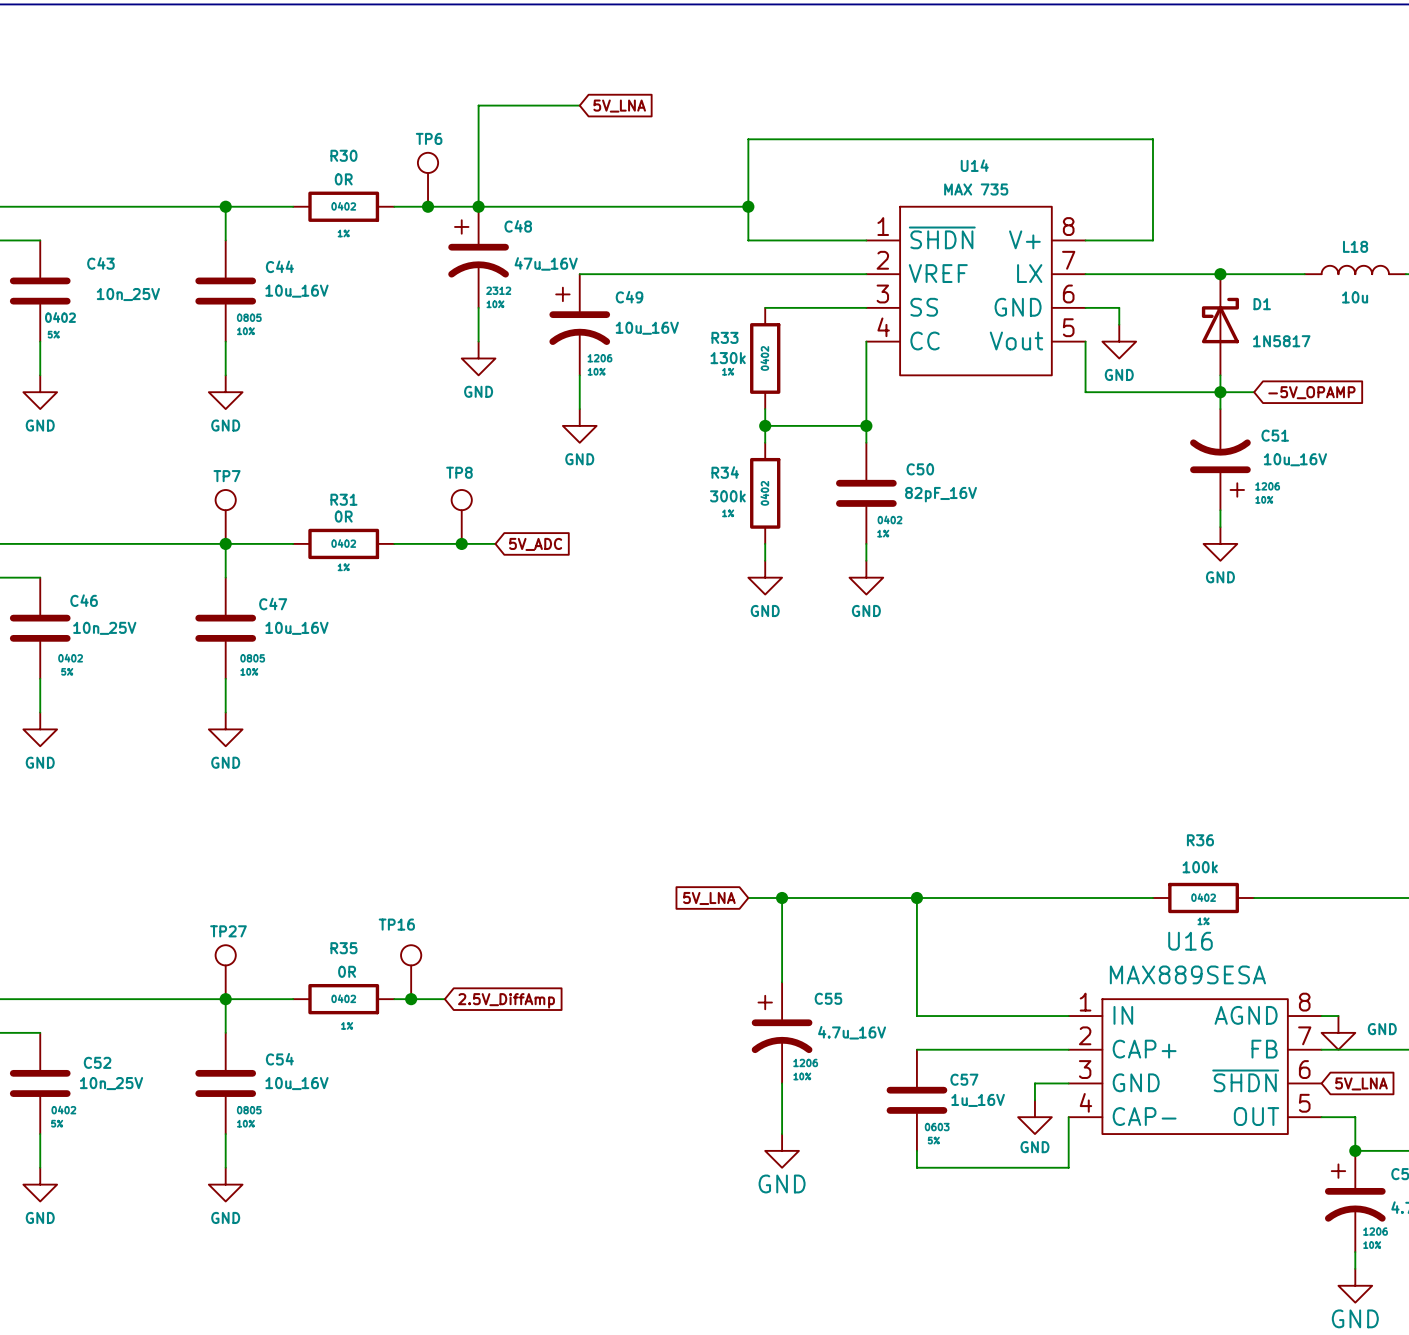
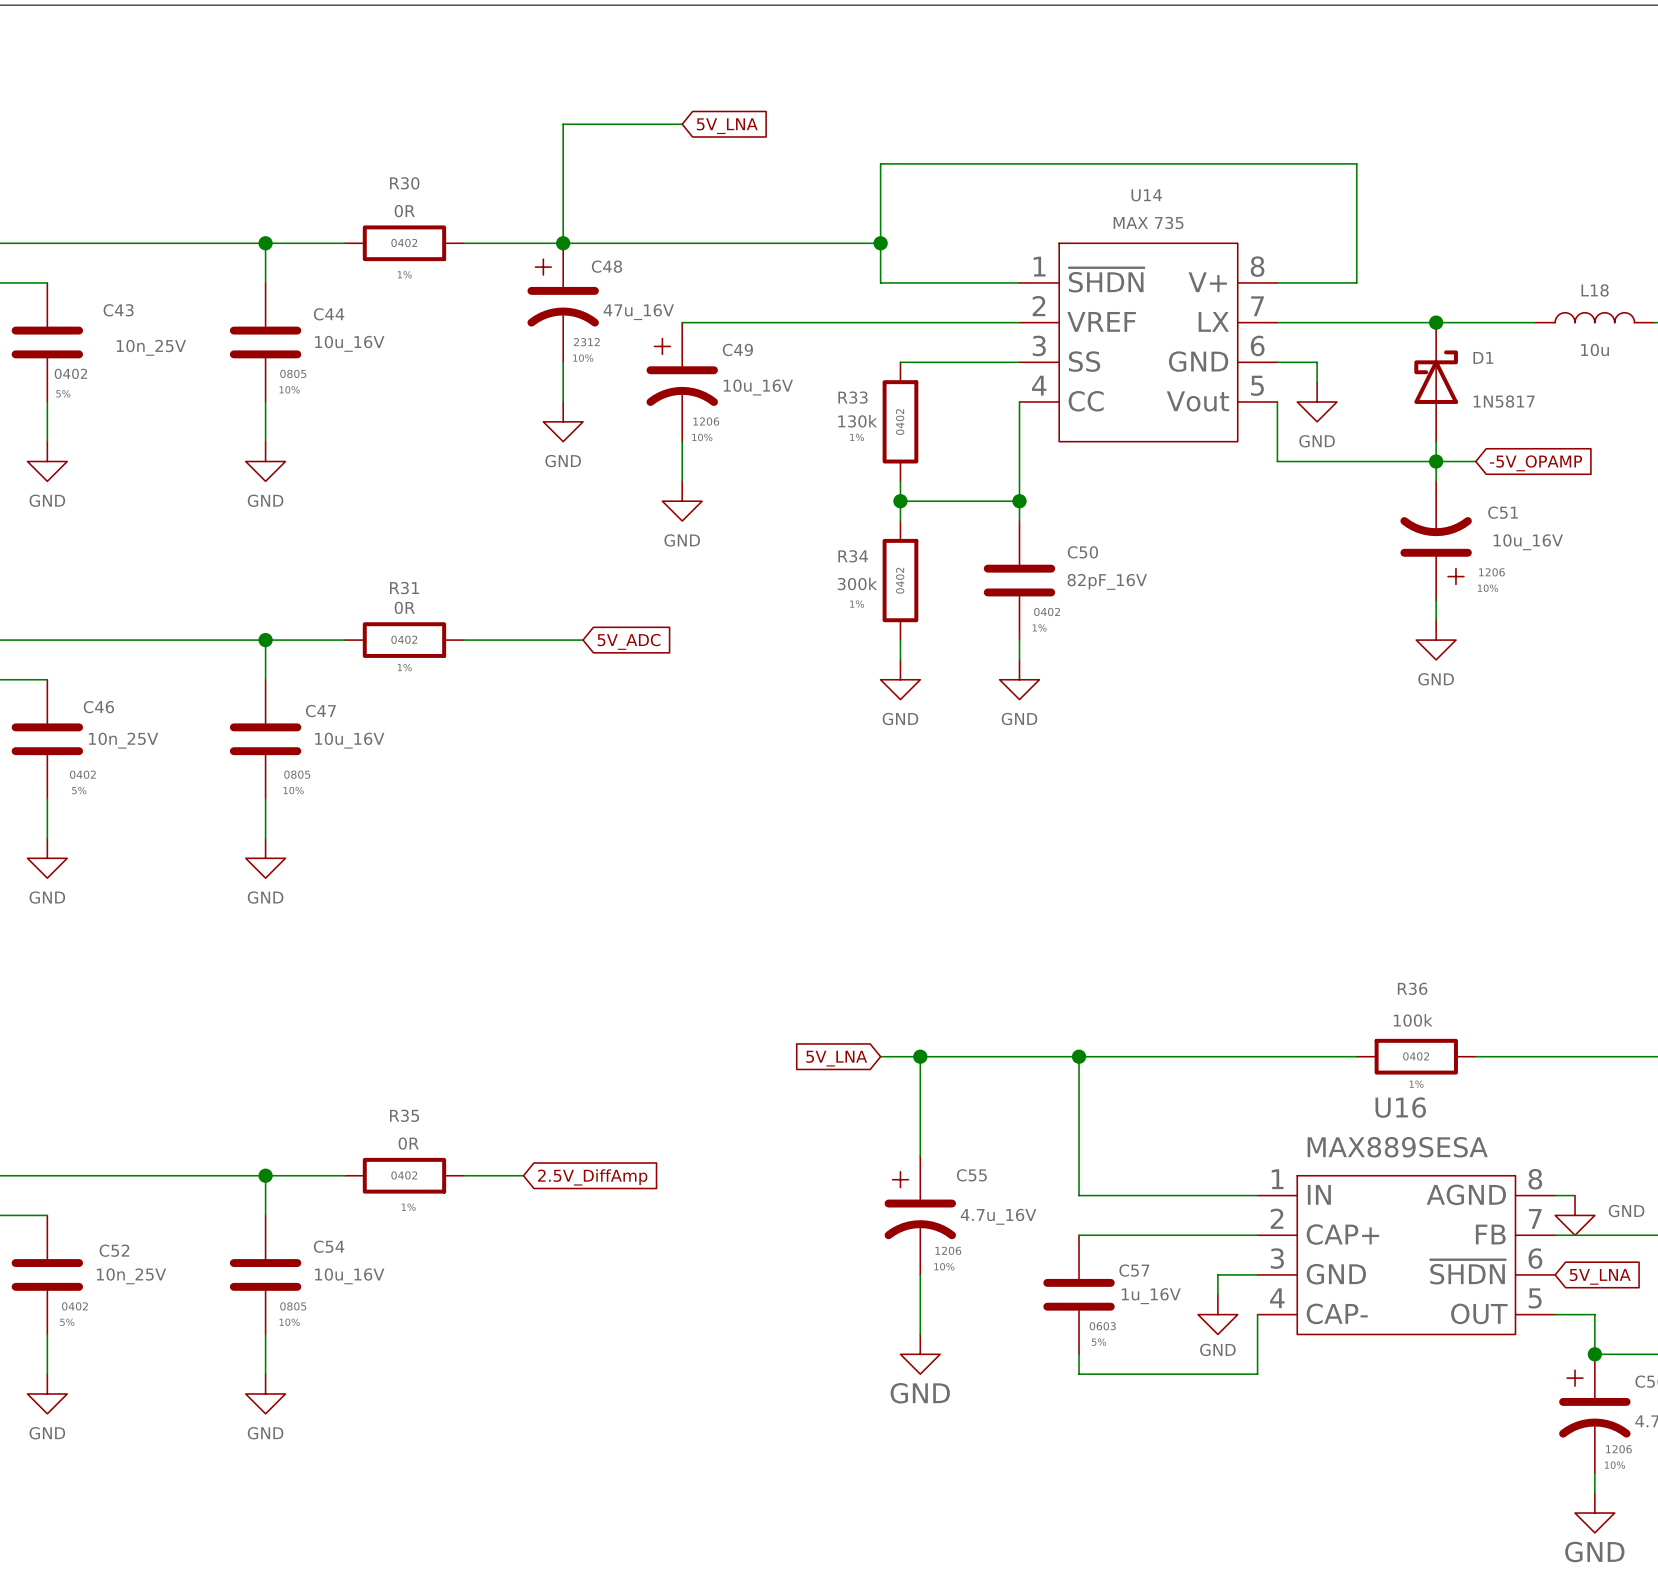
TP6: (428, 179) -> none
junction: (428, 206) -> none
TP7: (225, 516) -> none
TP8: (461, 516) -> none
junction: (461, 543) -> none
TP27: (225, 972) -> none
TP16: (411, 972) -> none
junction: (411, 999) -> none

